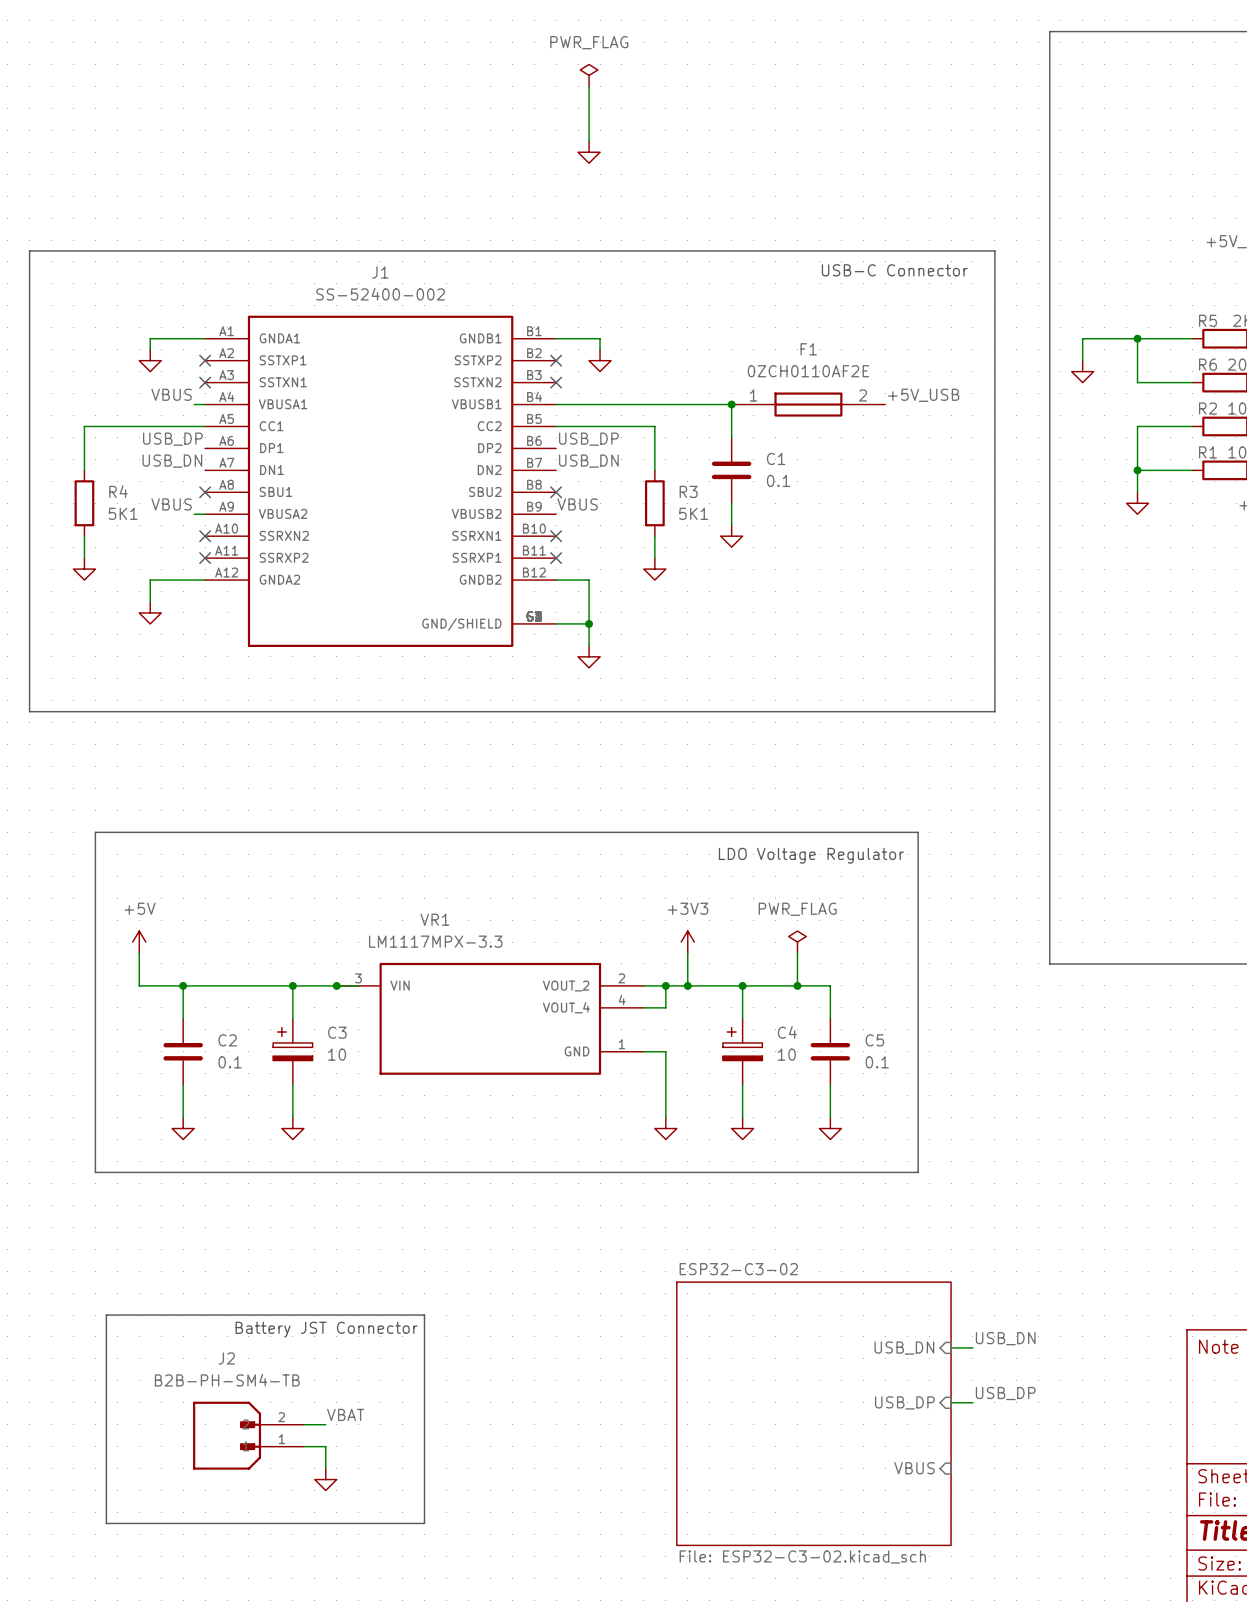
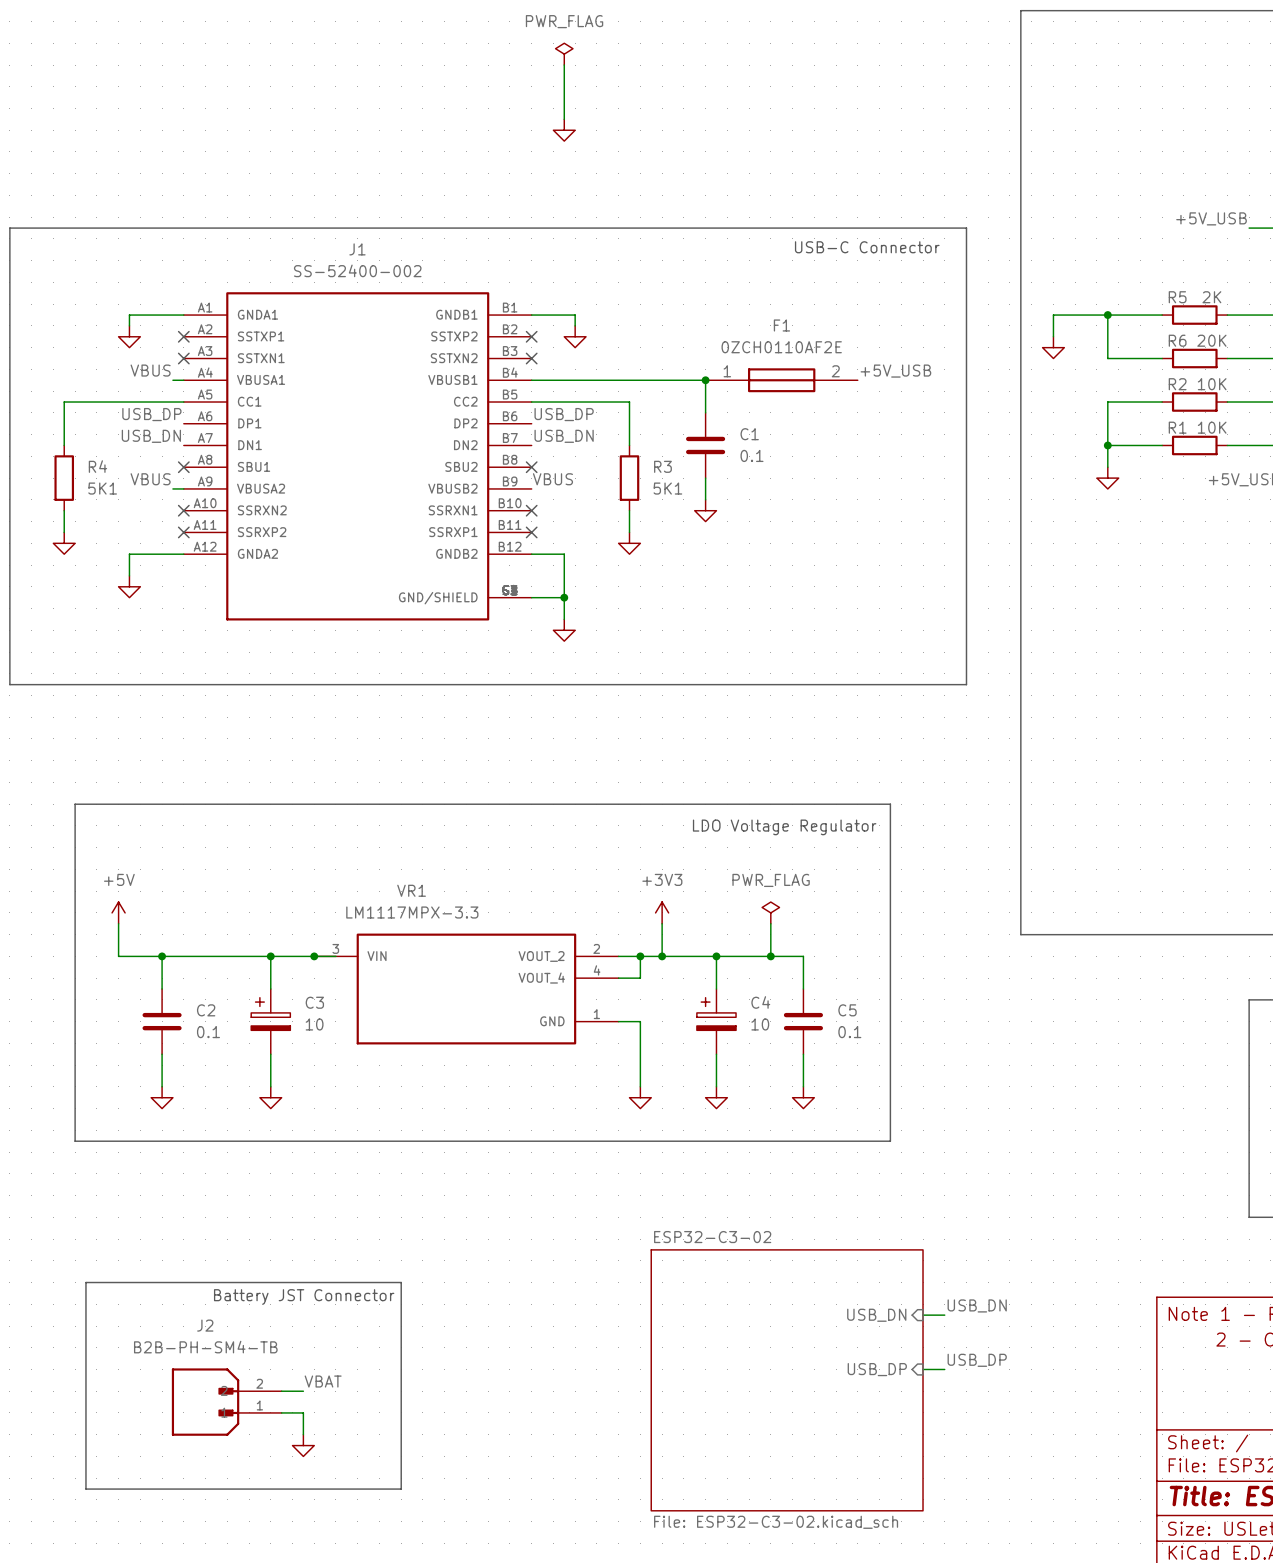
sheet pin: VBUS (914, 1468) -> none

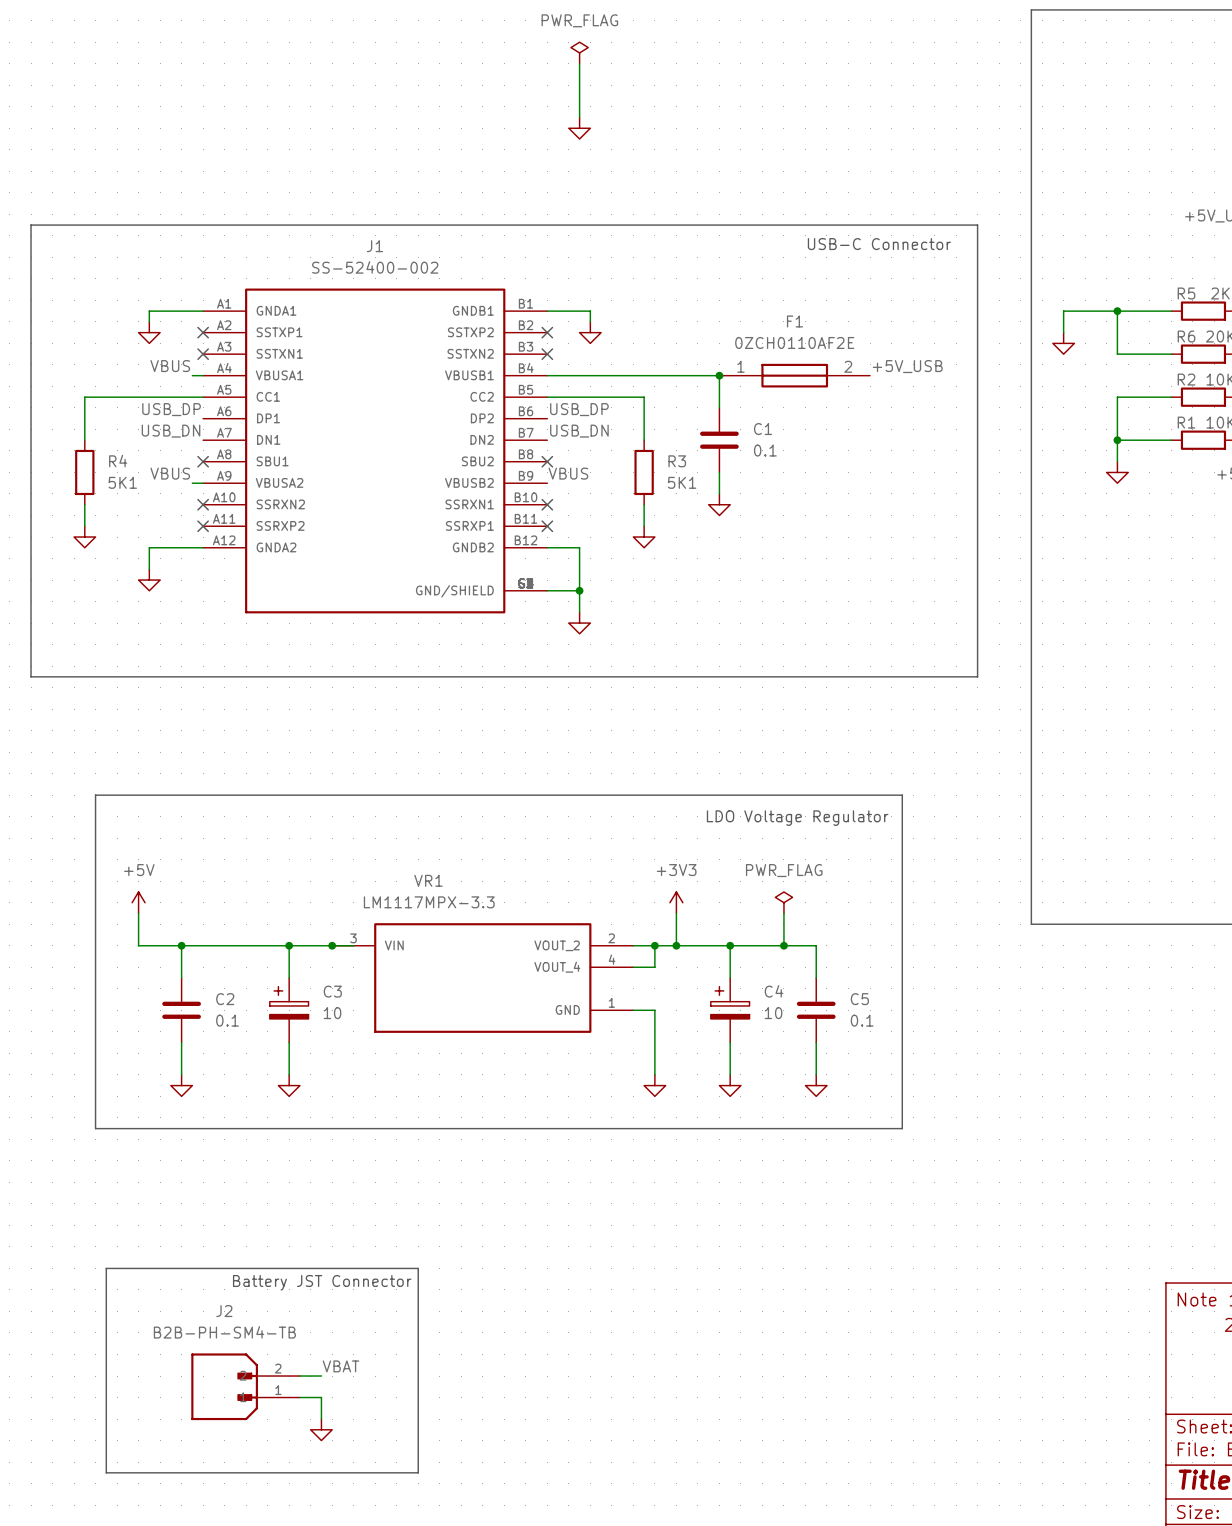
label: USB_DN (977, 1305) -> none
sheet pin: USB_DN (876, 1315) -> none
wire: (923, 1315) (944, 1315) -> none
label: USB_DP (977, 1360) -> none
sheet pin: USB_DP (877, 1369) -> none
wire: (923, 1369) (944, 1369) -> none
sheet ESP32-C3-02: File: ESP32-C3-02.kicad_sch (787, 1380) -> none

